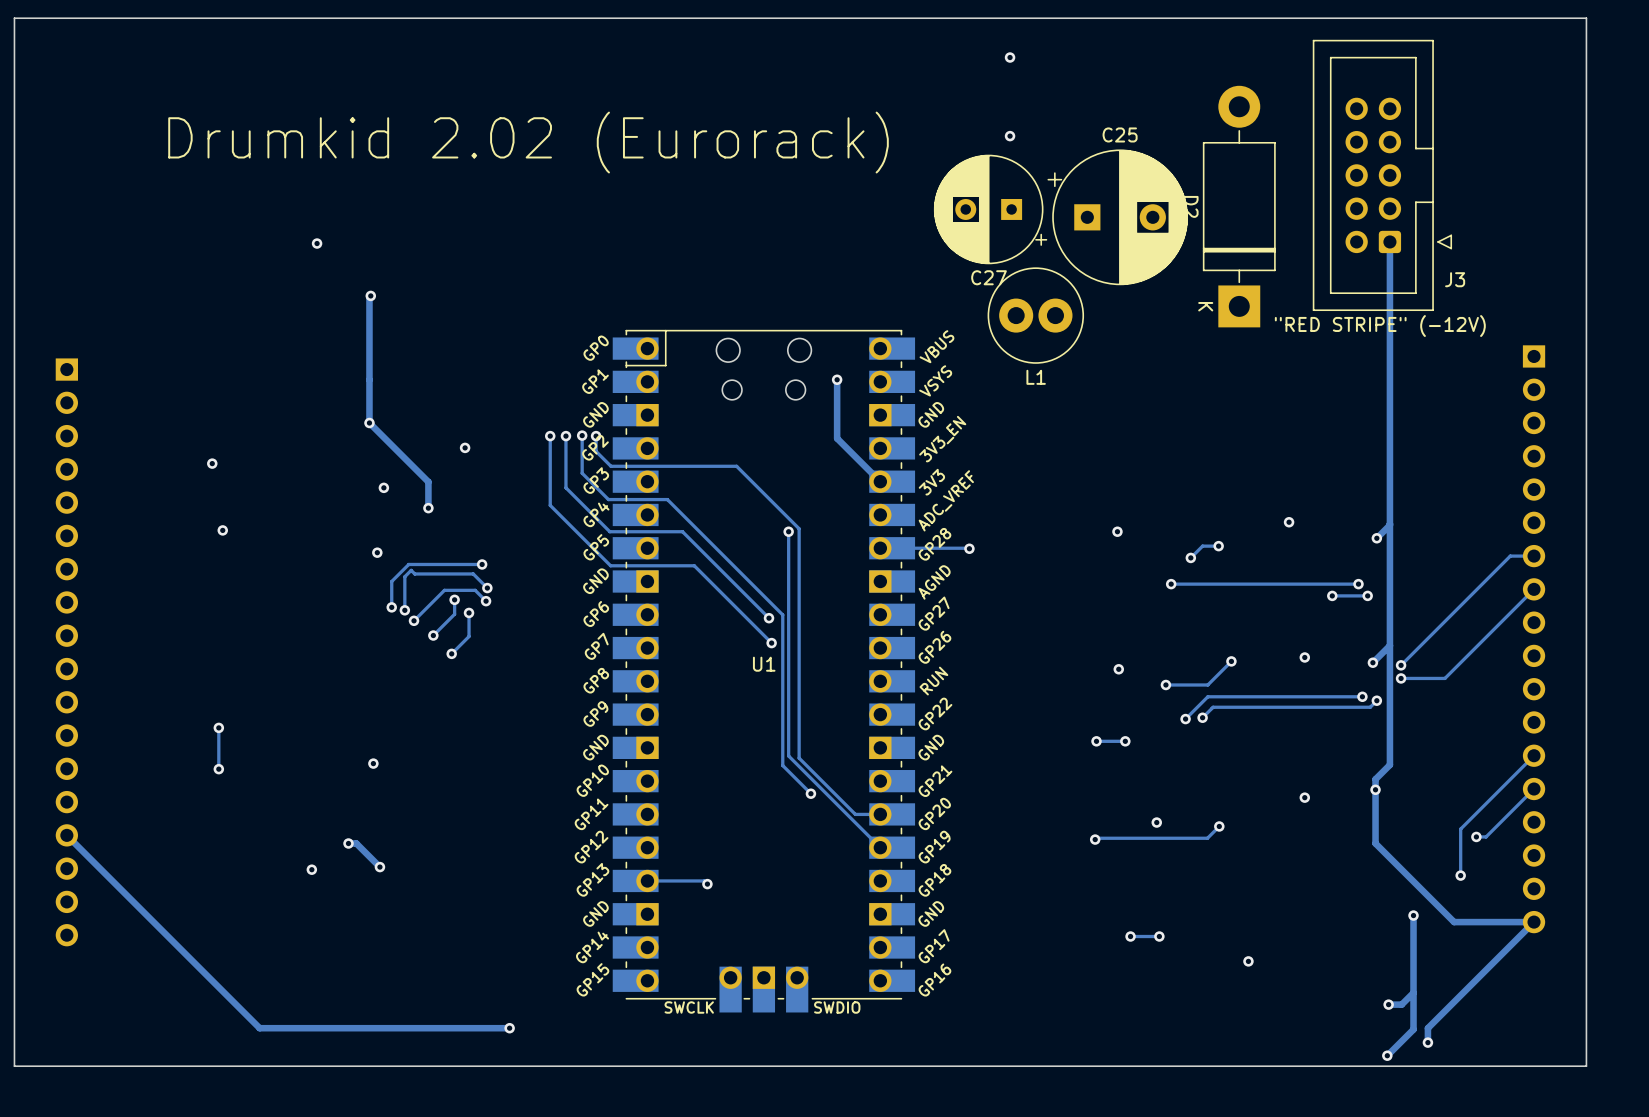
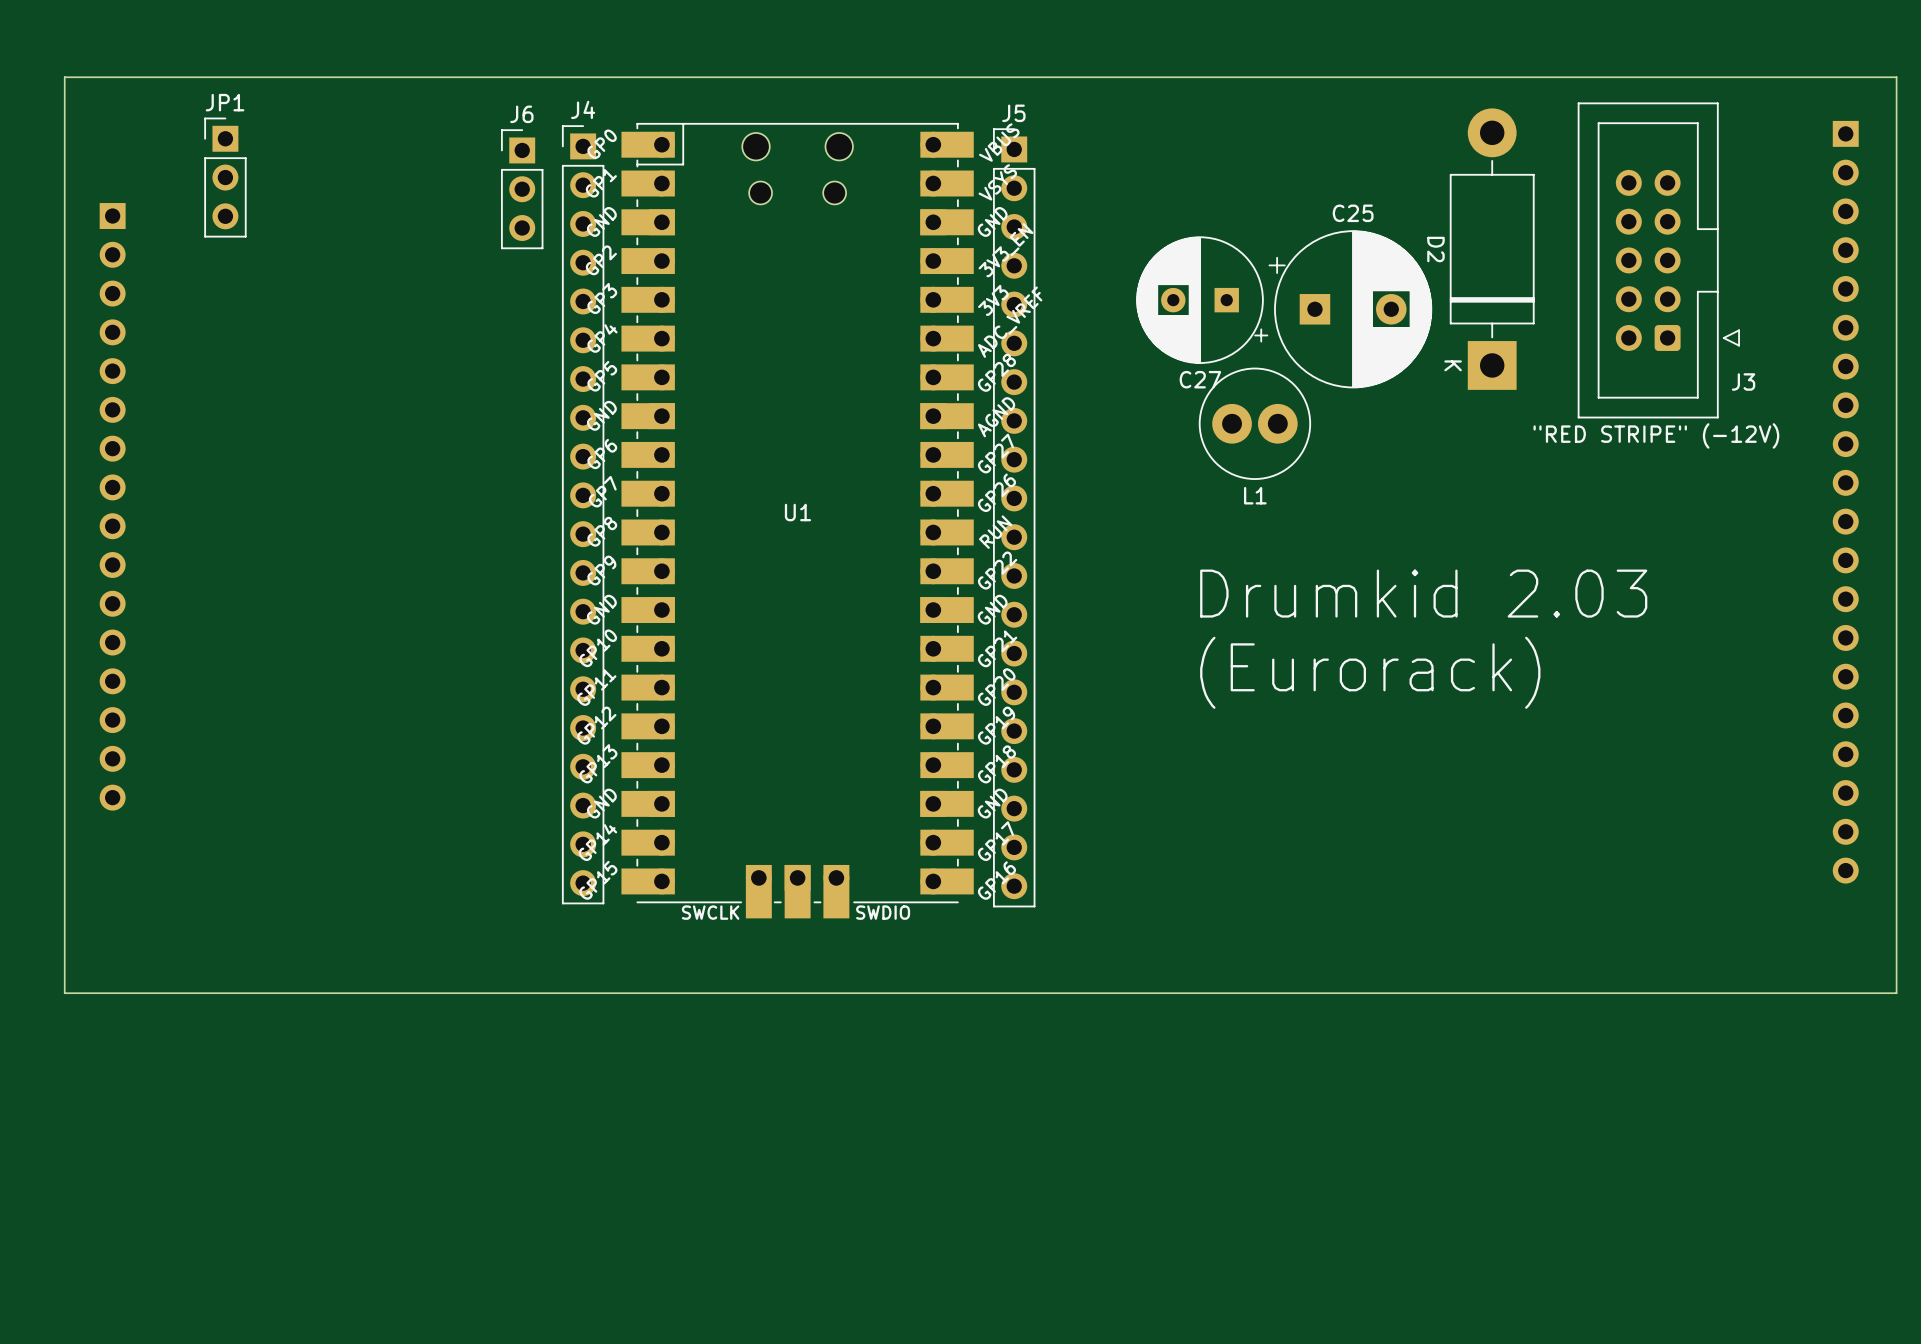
via: (1010, 57) -> none
JP1: none -> (225, 177)
J6: none -> (522, 189)
via: (1010, 136) -> none
text: Drumkid 2.02 (Eurorack) (528, 142) -> none
D2 position: (1239, 206) -> (1492, 249)
track: (1389, 241) (1389, 764) (1375, 779) (1375, 843) (1454, 922) (1534, 922) (1427, 1028) (1427, 1042) -> none
via: (317, 243) -> none
track: (370, 295) (369, 423) (428, 481) (428, 508) -> none
via: (370, 295) -> none
track: (837, 379) (837, 438) (880, 481) -> none
via: (837, 379) -> none
part: none -> (1845, 502)
part: none -> (112, 506)
J4: none -> (583, 514)
J5: none -> (1014, 517)
via: (369, 423) -> none
track: (582, 435) (582, 473) (608, 499) (667, 499) (782, 614) (782, 765) (810, 793) -> none
via: (582, 435) -> none
track: (550, 436) (550, 505) (610, 565) (694, 565) (771, 643) -> none
via: (550, 436) -> none
track: (565, 436) (565, 487) (609, 531) (682, 531) (769, 618) -> none
via: (565, 436) -> none
track: (596, 436) (596, 451) (610, 466) (736, 466) (799, 528) (799, 758) (855, 814) (880, 814) -> none
via: (596, 436) -> none
via: (465, 447) -> none
text: none -> Drumkid 2.03 (1423, 593)
via: (212, 463) -> none
via: (383, 487) -> none
via: (428, 508) -> none
via: (1289, 522) -> none
track: (1389, 525) (1376, 538) -> none
text: none -> (Eurorack) (1370, 672)
via: (222, 530) -> none
track: (788, 531) (788, 755) (880, 847) -> none
via: (788, 531) -> none
via: (1117, 531) -> none
via: (1376, 538) -> none
track: (1218, 546) (1202, 546) (1190, 557) -> none
via: (1218, 546) -> none
track: (880, 548) (969, 548) -> none
via: (969, 548) -> none
via: (377, 552) -> none
track: (1534, 556) (1510, 556) (1401, 665) -> none
via: (1190, 557) -> none
track: (482, 564) (408, 564) (391, 581) (391, 607) -> none
via: (482, 564) -> none
via: (1171, 584) -> none
track: (1358, 584) (1171, 584) -> none
via: (1358, 584) -> none
track: (487, 588) (473, 573) (414, 573) (411, 570) (404, 576) (404, 610) -> none
via: (487, 588) -> none
track: (1534, 589) (1444, 678) (1401, 678) -> none
via: (1332, 595) -> none
track: (1367, 595) (1332, 595) -> none
via: (1367, 595) -> none
track: (454, 599) (454, 614) (433, 635) -> none
via: (454, 599) -> none
track: (486, 601) (475, 590) (444, 590) (414, 620) -> none
via: (486, 601) -> none
via: (391, 607) -> none
via: (404, 610) -> none
track: (469, 612) (469, 636) (451, 653) -> none
via: (469, 612) -> none
via: (769, 618) -> none
via: (414, 620) -> none
via: (433, 635) -> none
part: (1534, 639) -> none
via: (771, 643) -> none
track: (1389, 645) (1372, 662) -> none
part: (66, 652) -> none
via: (451, 653) -> none
via: (1304, 657) -> none
track: (1231, 661) (1207, 684) (1165, 684) -> none
via: (1231, 661) -> none
via: (1372, 662) -> none
via: (1401, 665) -> none
via: (1118, 669) -> none
U1 position: (763, 671) -> (797, 520)
via: (1401, 678) -> none
via: (1165, 684) -> none
track: (1362, 696) (1207, 696) (1185, 719) -> none
via: (1362, 696) -> none
track: (1376, 700) (1370, 707) (1213, 707) (1202, 717) -> none
via: (1376, 700) -> none
via: (1202, 717) -> none
via: (1185, 719) -> none
track: (218, 727) (218, 769) -> none
via: (218, 727) -> none
via: (1096, 741) -> none
track: (1125, 741) (1096, 741) -> none
via: (1125, 741) -> none
track: (1534, 755) (1460, 829) (1460, 875) -> none
via: (373, 763) -> none
via: (218, 769) -> none
via: (1375, 789) -> none
track: (1534, 789) (1486, 836) (1476, 836) -> none
via: (810, 793) -> none
via: (1304, 797) -> none
board edge: (1586, 804) (1586, 1066) (14, 1066) (14, 804) -> (1896, 993) (64, 993)
via: (1156, 822) -> none
track: (1219, 826) (1207, 838) (1095, 839) -> none
via: (1219, 826) -> none
track: (66, 835) (259, 1028) (509, 1028) -> none
via: (1476, 836) -> none
via: (1095, 839) -> none
track: (348, 843) (356, 843) (379, 867) -> none
via: (348, 843) -> none
via: (379, 867) -> none
via: (311, 869) -> none
via: (1460, 875) -> none
track: (647, 880) (704, 880) (707, 884) -> none
via: (707, 884) -> none
track: (1413, 915) (1413, 1029) (1387, 1055) -> none
via: (1413, 915) -> none
via: (1130, 936) -> none
track: (1159, 936) (1130, 936) -> none
via: (1159, 936) -> none
via: (1248, 961) -> none
track: (1413, 992) (1401, 1004) (1388, 1004) -> none
via: (1388, 1004) -> none
via: (509, 1028) -> none
via: (1427, 1042) -> none
via: (1387, 1055) -> none

